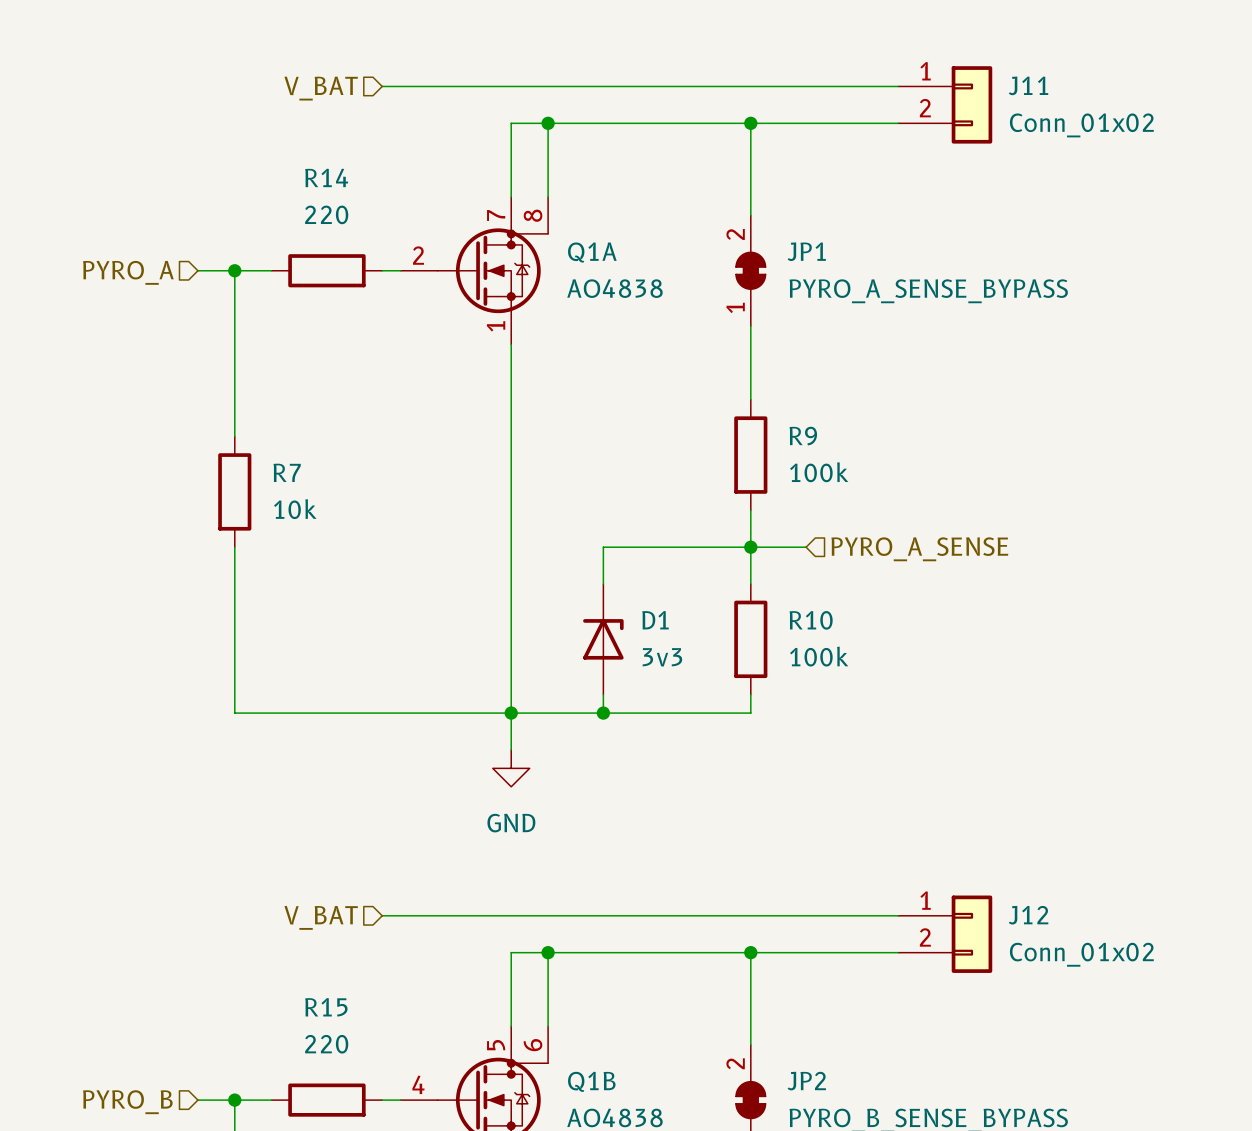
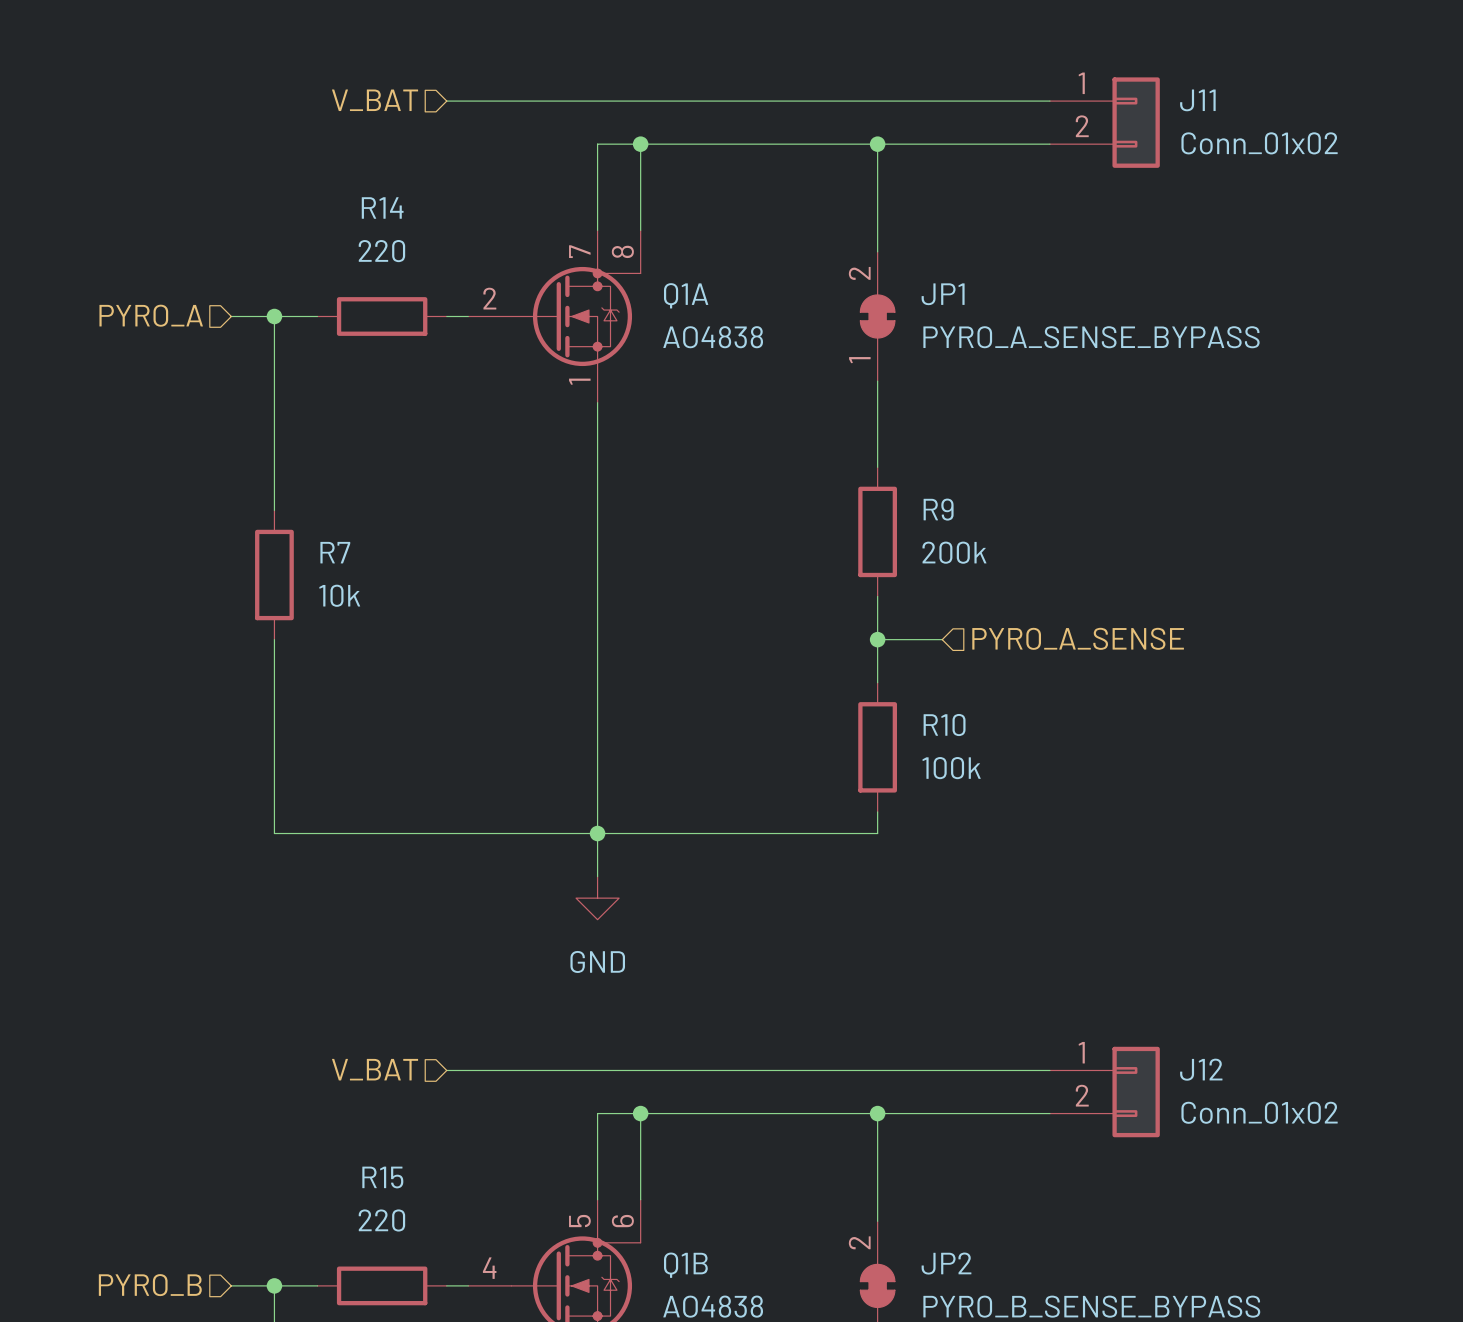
R9 value: 100k (819, 472) -> 200k (954, 552)
wire: (750, 547) (603, 547) (603, 584) -> none
D1: 3v3 (603, 639) -> none
wire: (603, 694) (603, 713) -> none
junction: (603, 713) -> none

